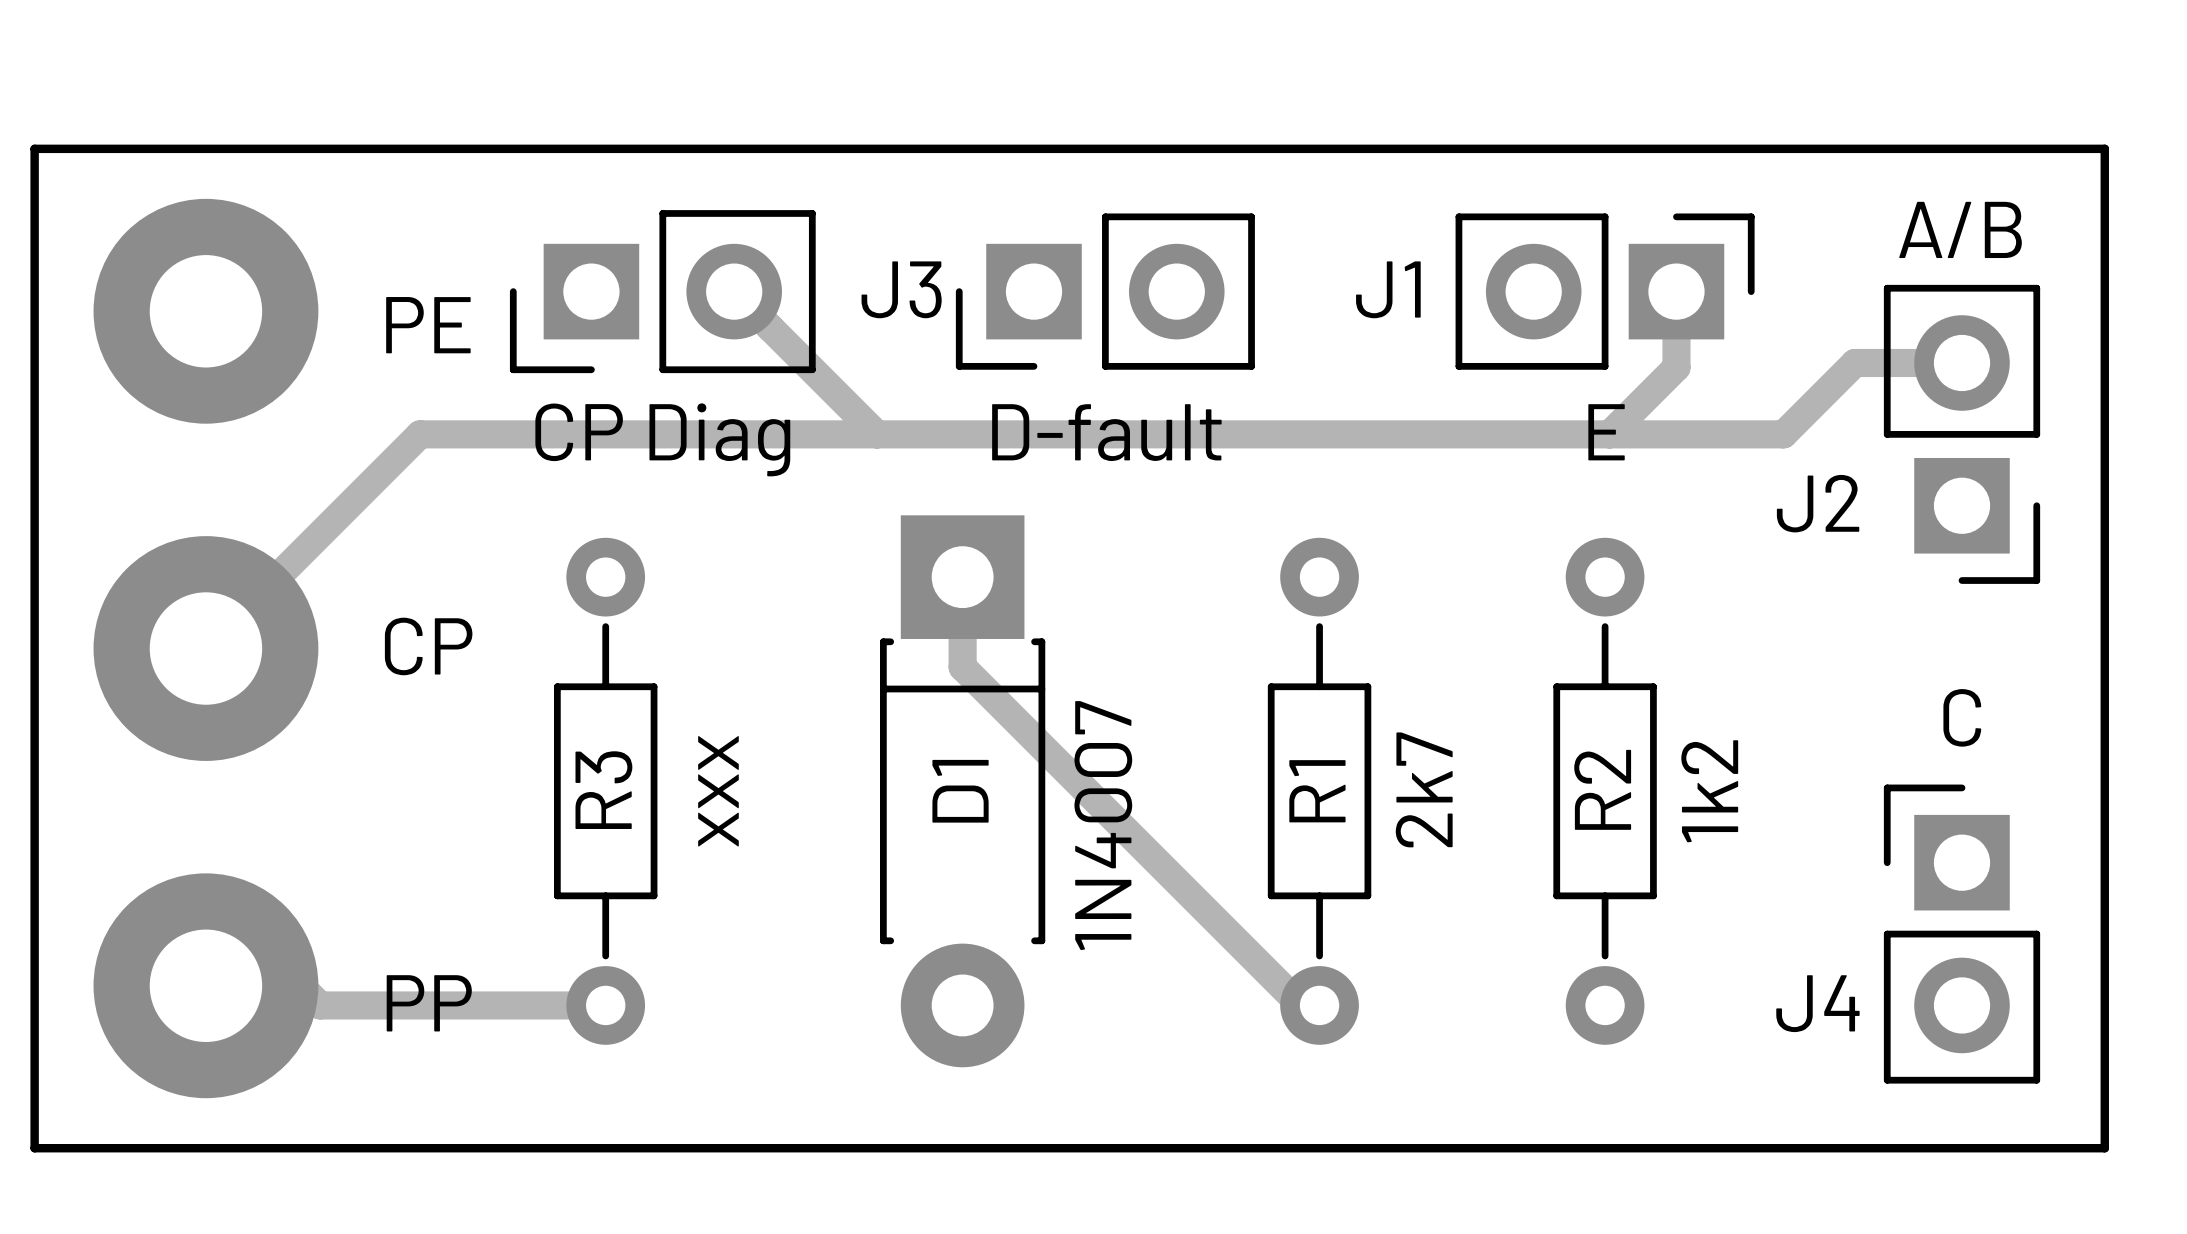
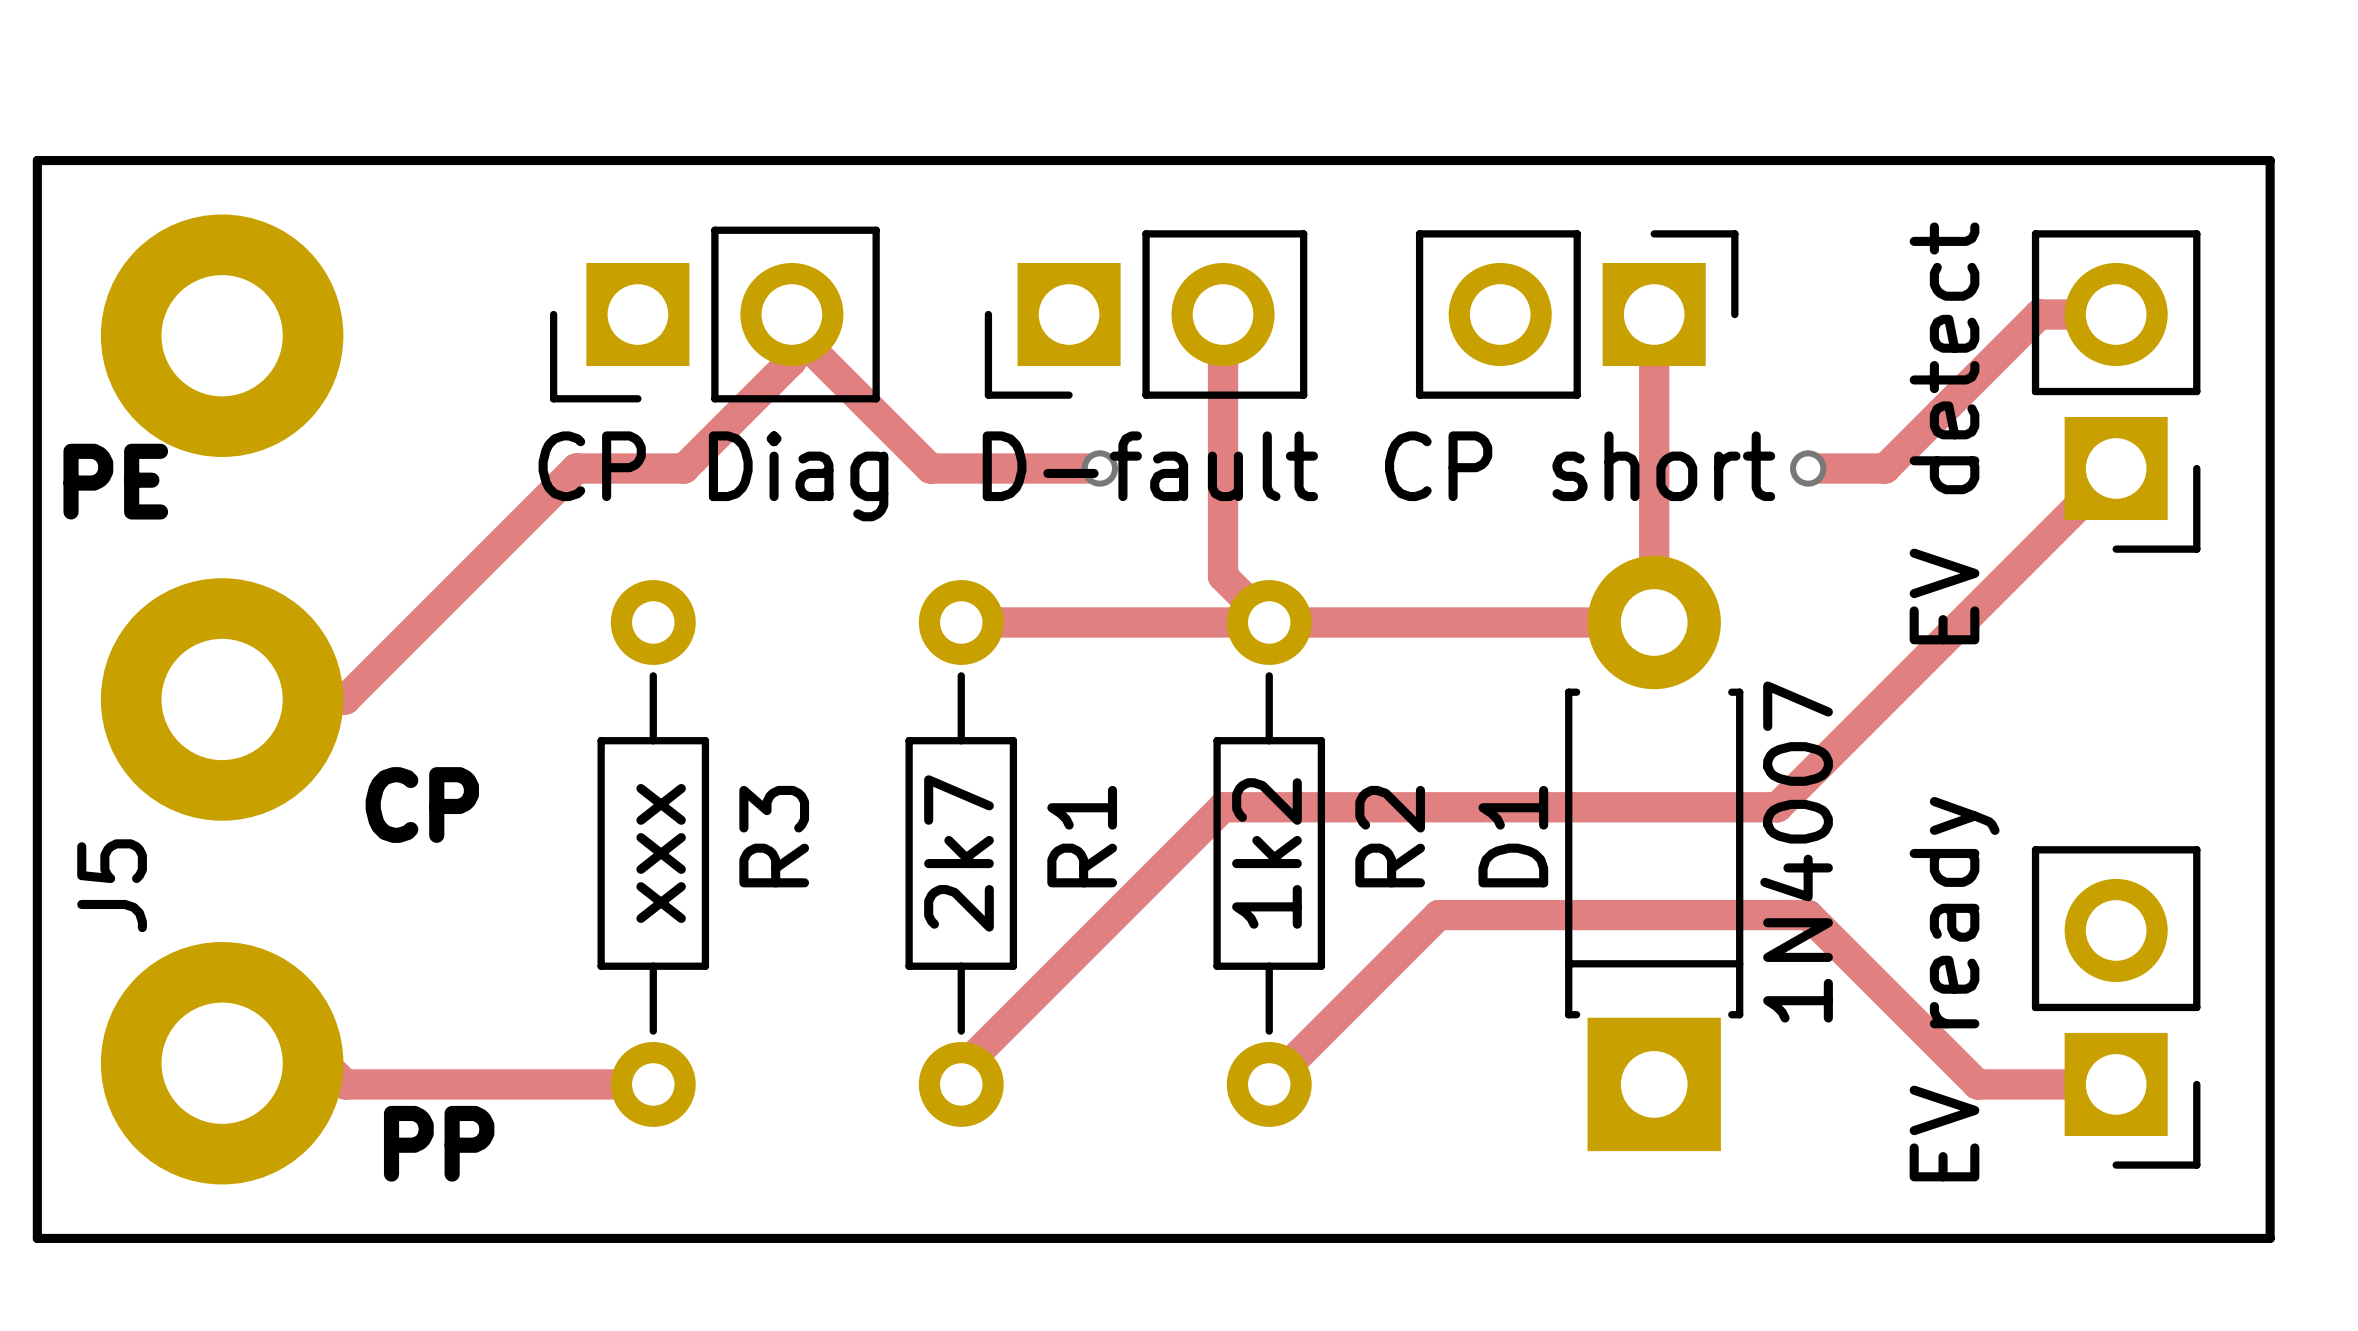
J3 name: J3 (901, 289) -> none
track: (734, 291) (876, 434) -> (791, 314) (791, 360) (684, 468)
J3 position: (1105, 291) -> (1146, 314)
track: none -> (1223, 314) (1223, 576) (1269, 622)
part: none -> CP short (1577, 314)
track: none -> (1654, 314) (1654, 622) (961, 622)
J1: E (1605, 291) -> none
track: (1676, 291) (1676, 367) (1609, 434) -> none
text position: PE (428, 325) -> PE (115, 481)
track: (1962, 362) (1854, 362) (1783, 434) (1747, 434) -> (2116, 314) (2039, 314) (1885, 468)
part: none -> EV detect (2116, 391)
track: (534, 434) (420, 434) (205, 648) -> (576, 468) (345, 699) (252, 699)
track: (634, 434) (862, 434) -> (791, 329) (930, 468)
track: (1019, 434) (1676, 434) -> none
via: none -> (1099, 468)
via: none -> (1808, 468)
track: none -> (2116, 468) (1777, 807) (1223, 807) (961, 1069) (961, 1084)
J2: A/B (1962, 434) -> none
track: (962, 577) (962, 667) (1301, 1005) (1319, 1005) -> none
text position: CP (428, 646) -> CP (422, 805)
R1 value position: 2k7 (1424, 789) -> 2k7 (959, 853)
R2 name position: R2 (1602, 789) -> R2 (1390, 836)
R3 name position: R3 (603, 790) -> R3 (774, 836)
R3 value position: xxx (718, 791) -> xxx (661, 853)
D1 name position: D1 (960, 791) -> D1 (1513, 836)
D1 rotation: 0° (962, 791) -> 180° (1654, 853)
D1 position: (962, 791) -> (1654, 853)
R1 name position: R1 (1317, 791) -> R1 (1082, 836)
R1 position: (1319, 791) -> (961, 853)
R2 position: (1605, 791) -> (1269, 853)
R2 value position: 1k2 (1709, 791) -> 1k2 (1266, 853)
J5 name: none -> J5 (112, 885)
J4: C (1962, 934) -> none
part: none -> EV ready (2116, 1007)
text position: PP (429, 1003) -> PP (439, 1143)
track: none -> (1269, 1084) (1438, 915) (1808, 915) (1977, 1084) (2116, 1084)

